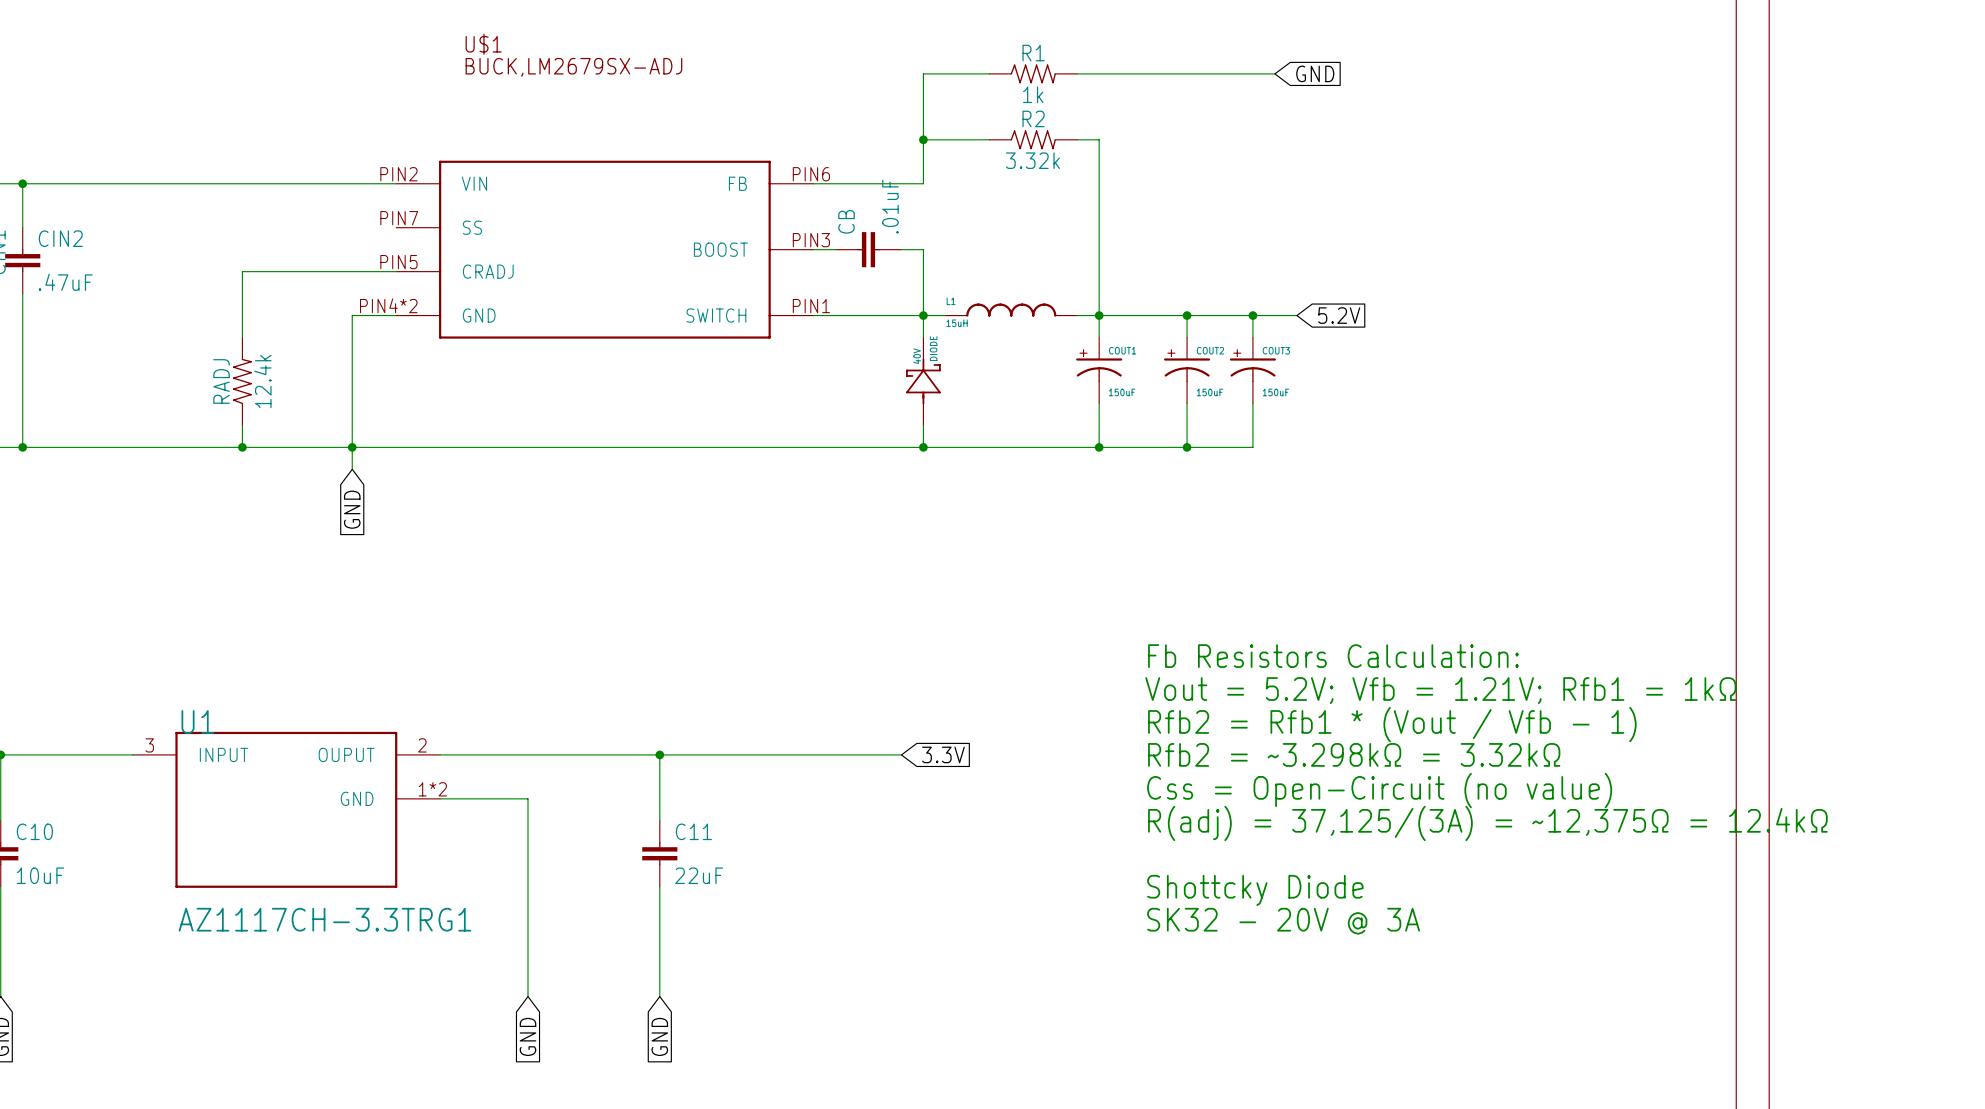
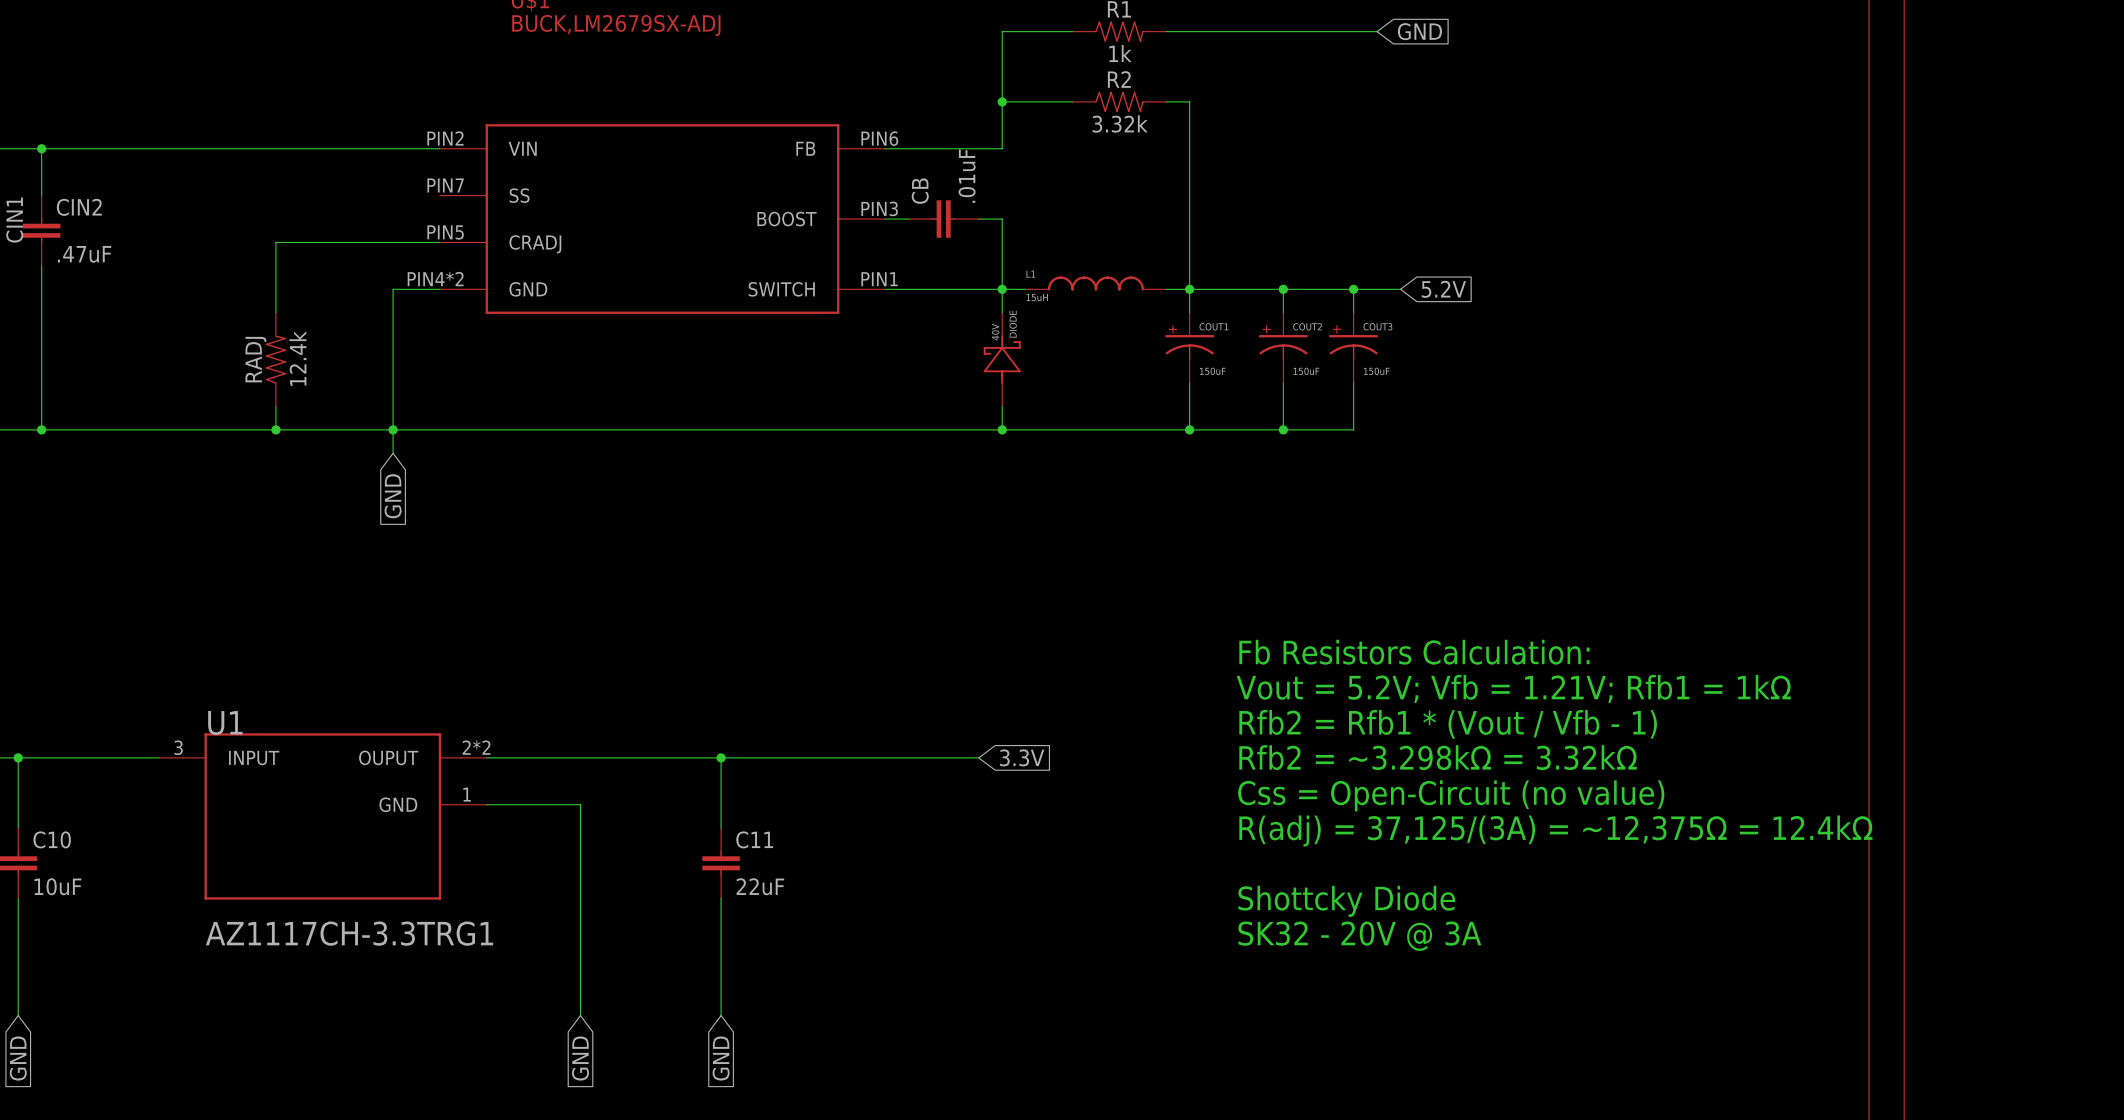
U1 pin number: 2 (422, 745) -> 2*2 (476, 747)
U1 pin number: 1*2 (432, 789) -> 1 (467, 794)

